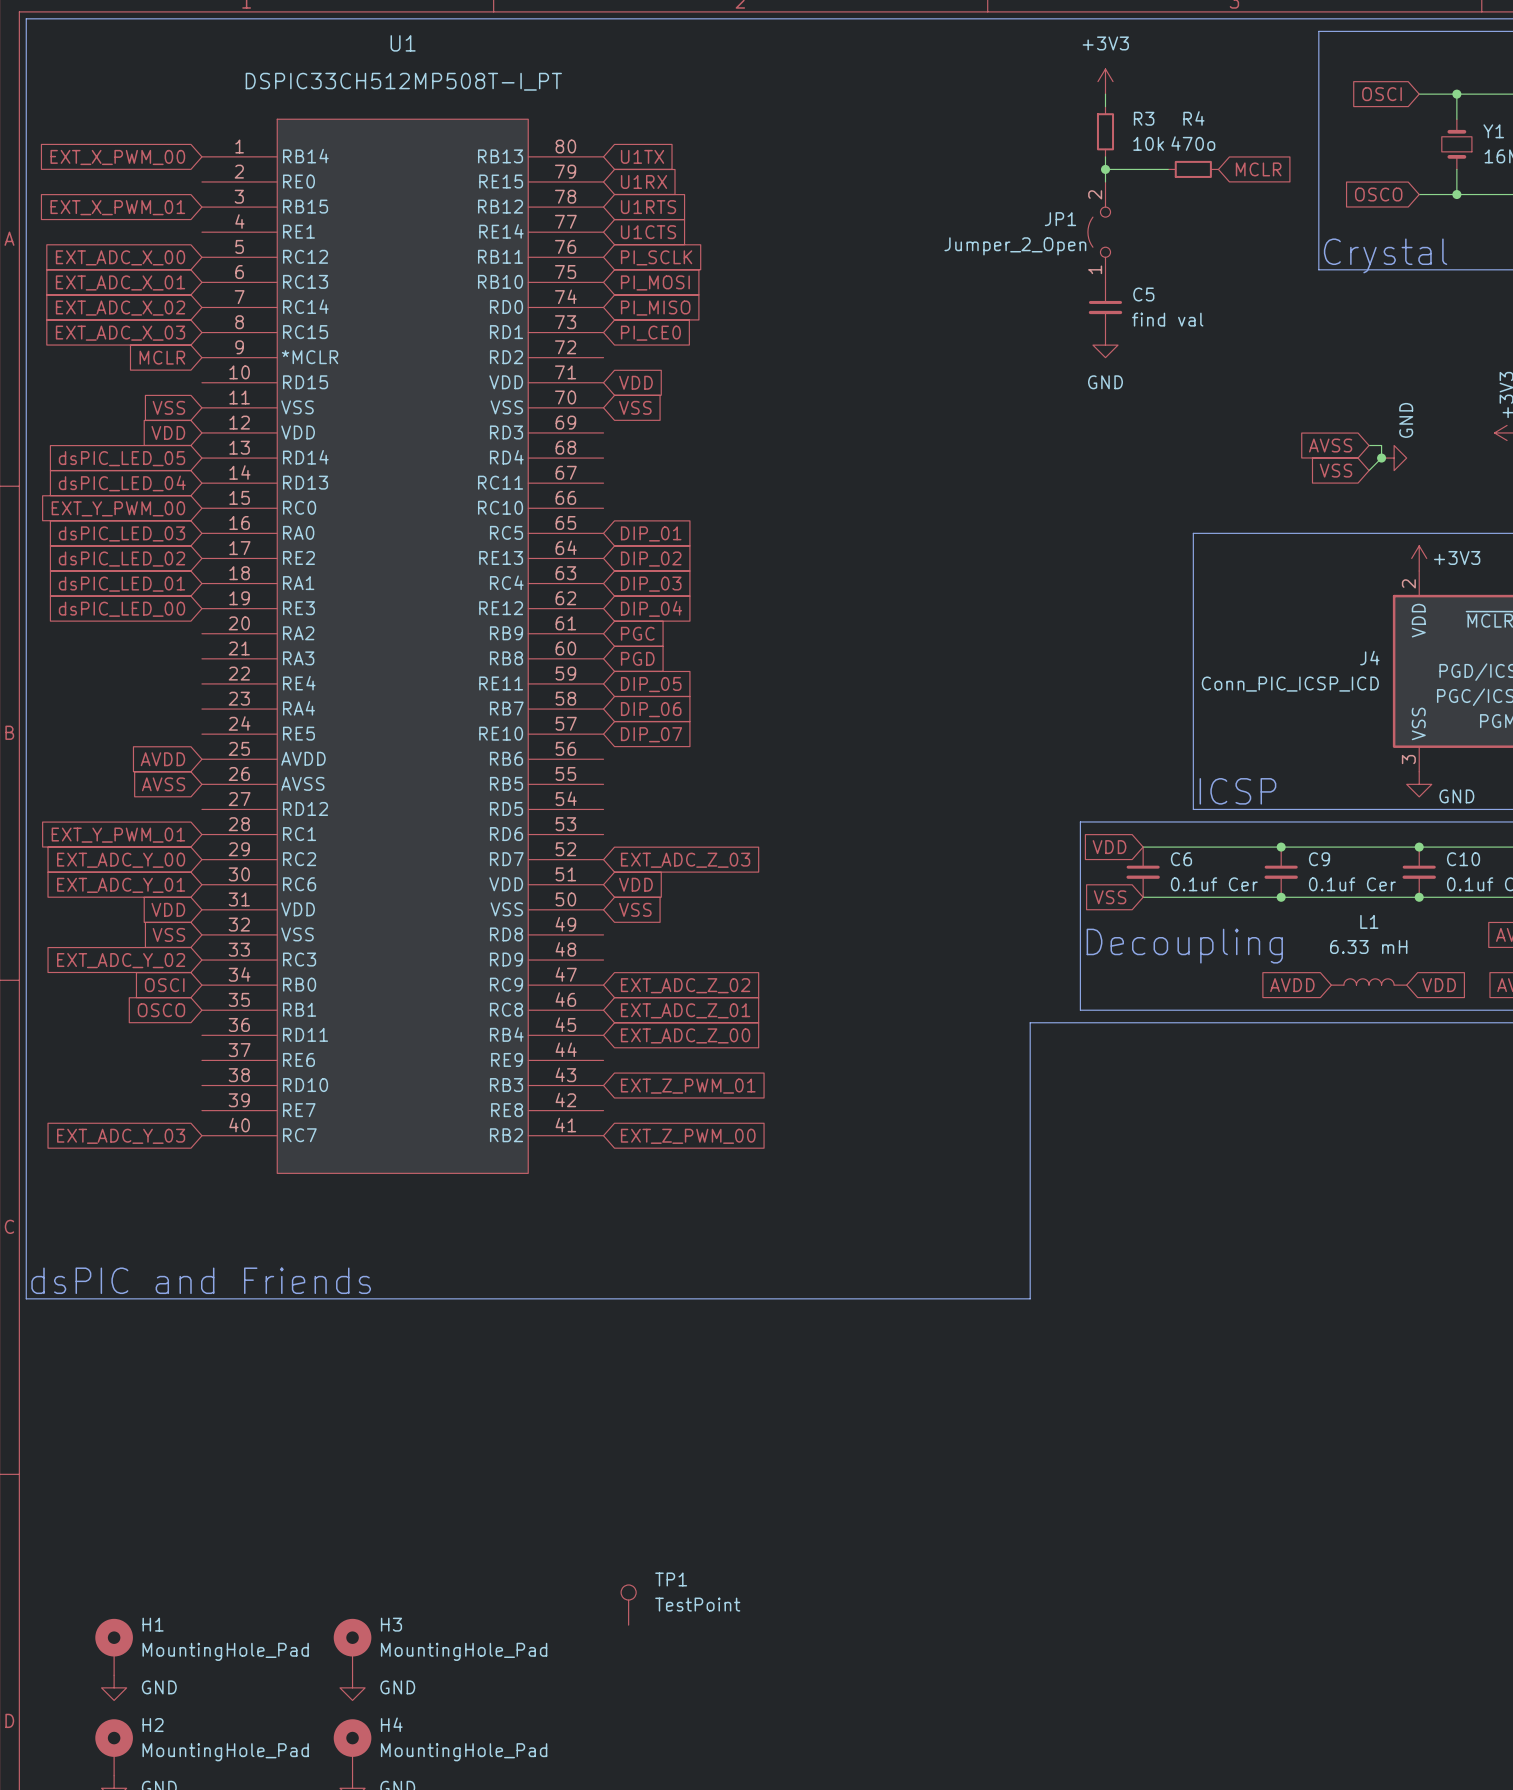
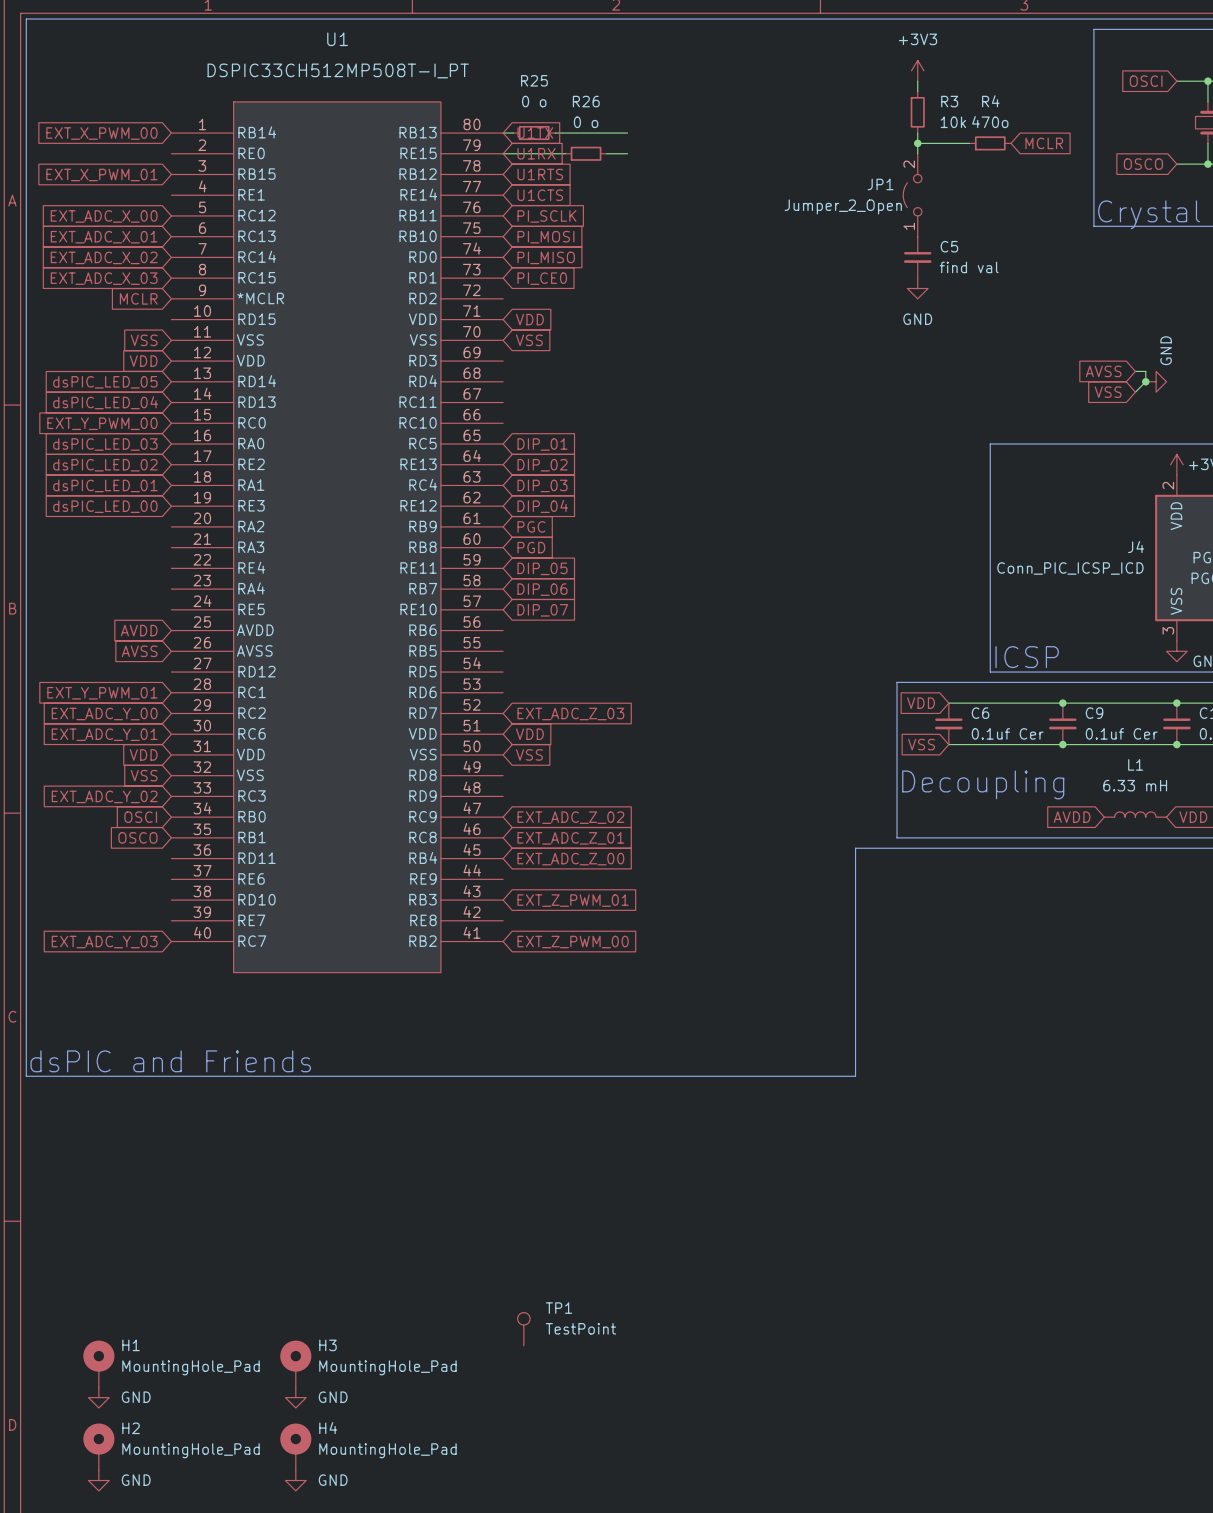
wire: none -> (503, 133) (513, 133)
R25: none -> 0 o (534, 133)
wire: none -> (554, 133) (627, 133)
wire: none -> (503, 153) (565, 153)
R26: none -> 0 o (586, 153)
wire: none -> (606, 153) (627, 153)

